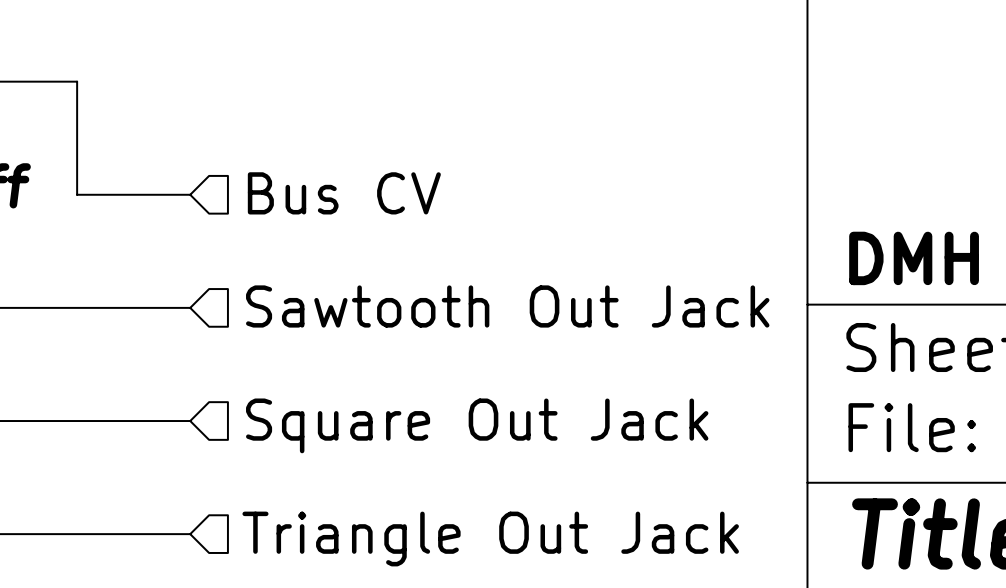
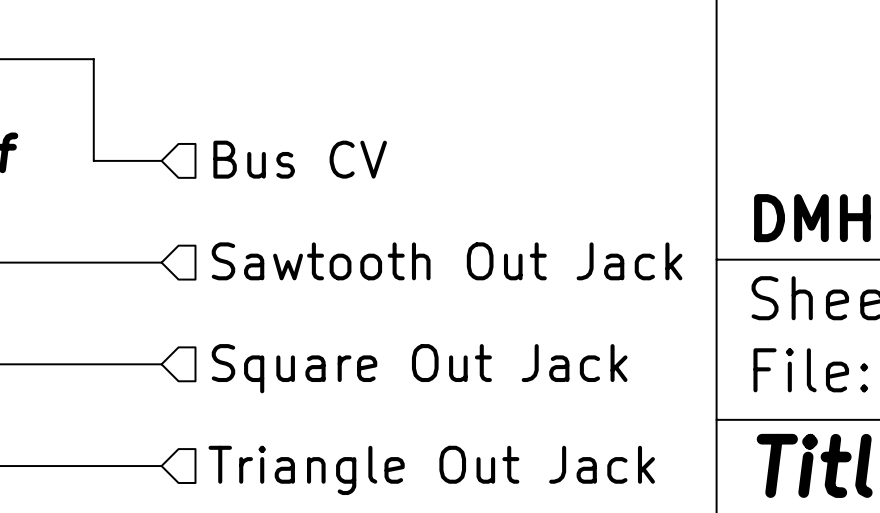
wire: (77, 81) (77, 194) (114, 194) -> (59, 59) (93, 59) (93, 160)

